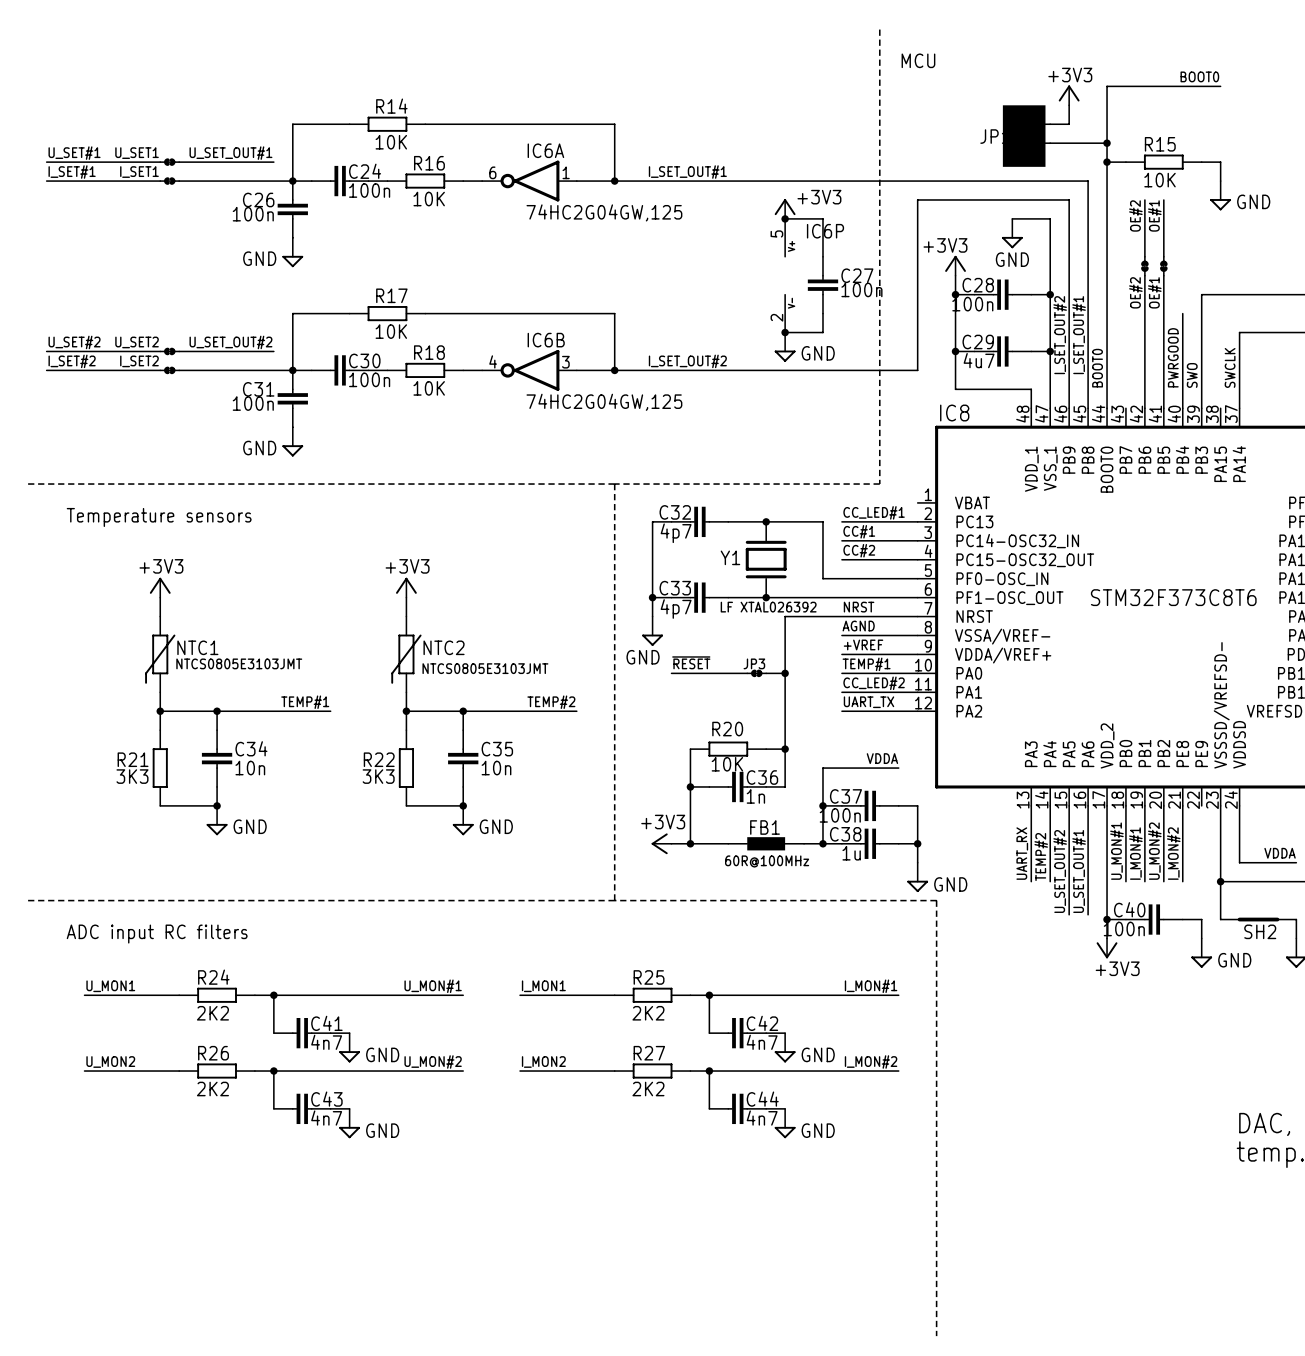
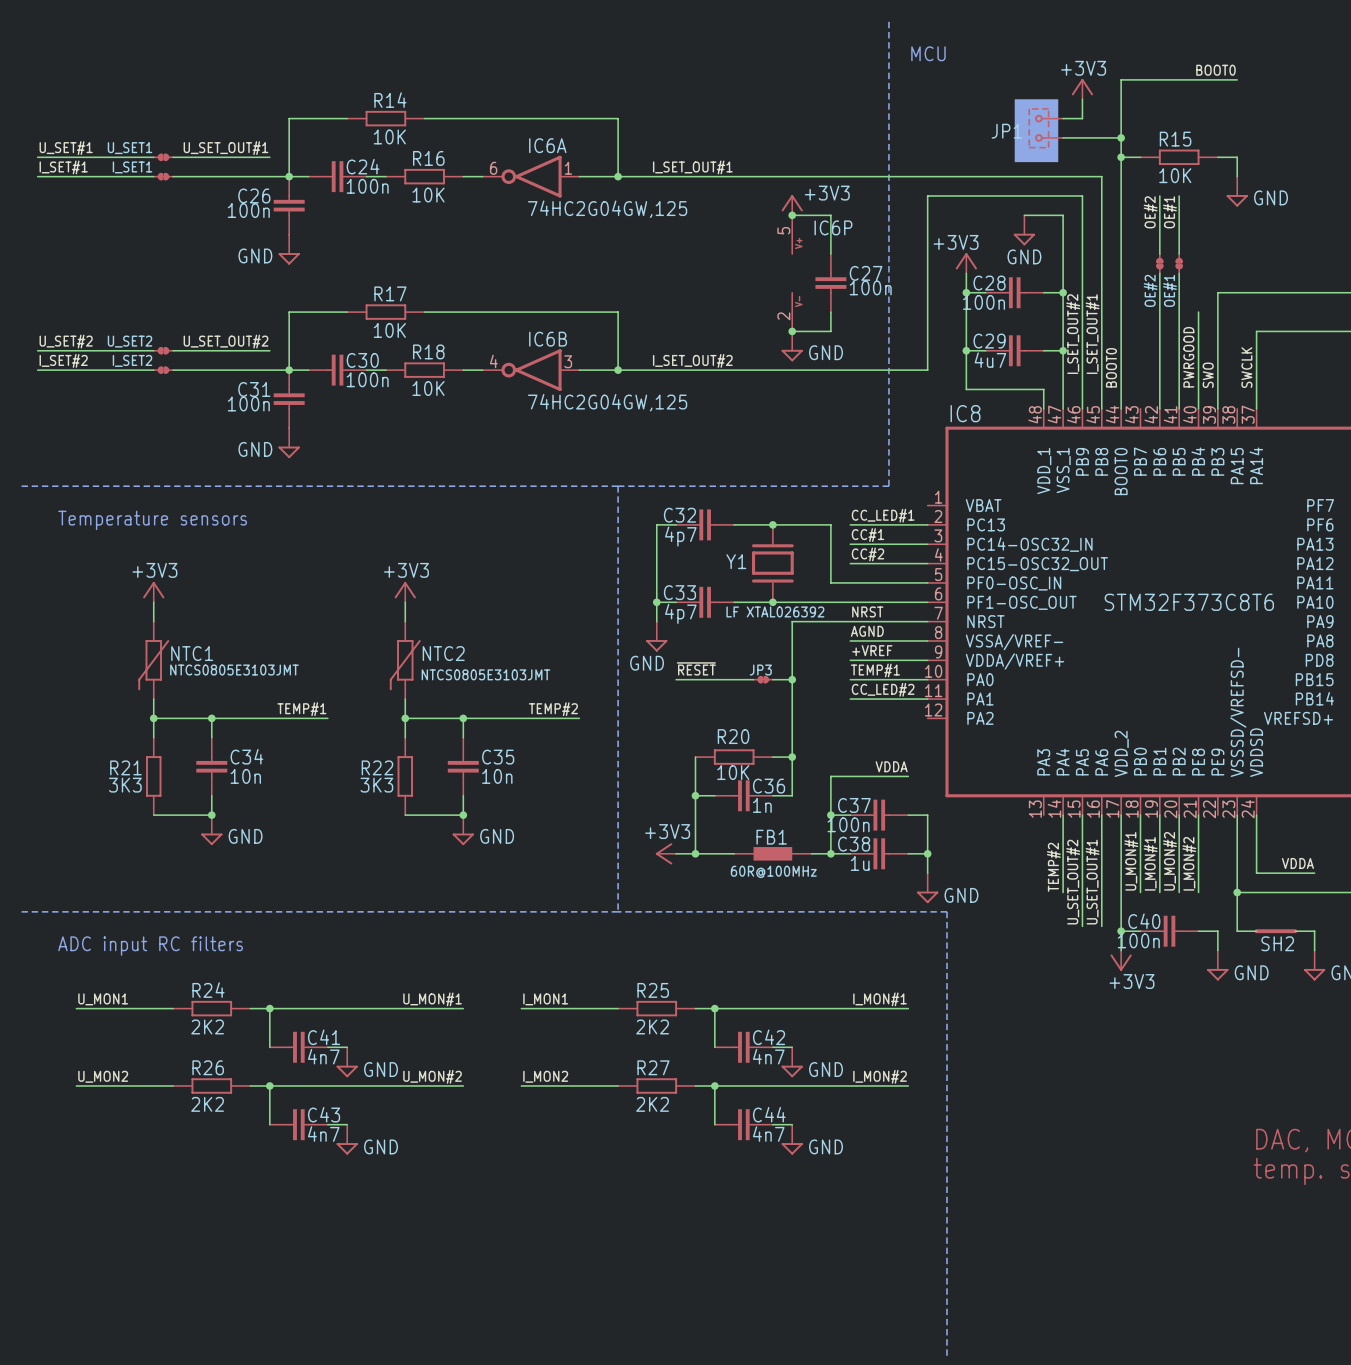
label: UART_TX (869, 702) -> none
wire: (841, 711) (917, 711) -> none
wire: (1031, 805) (1031, 881) -> none
label: UART_RX (1022, 853) -> none

